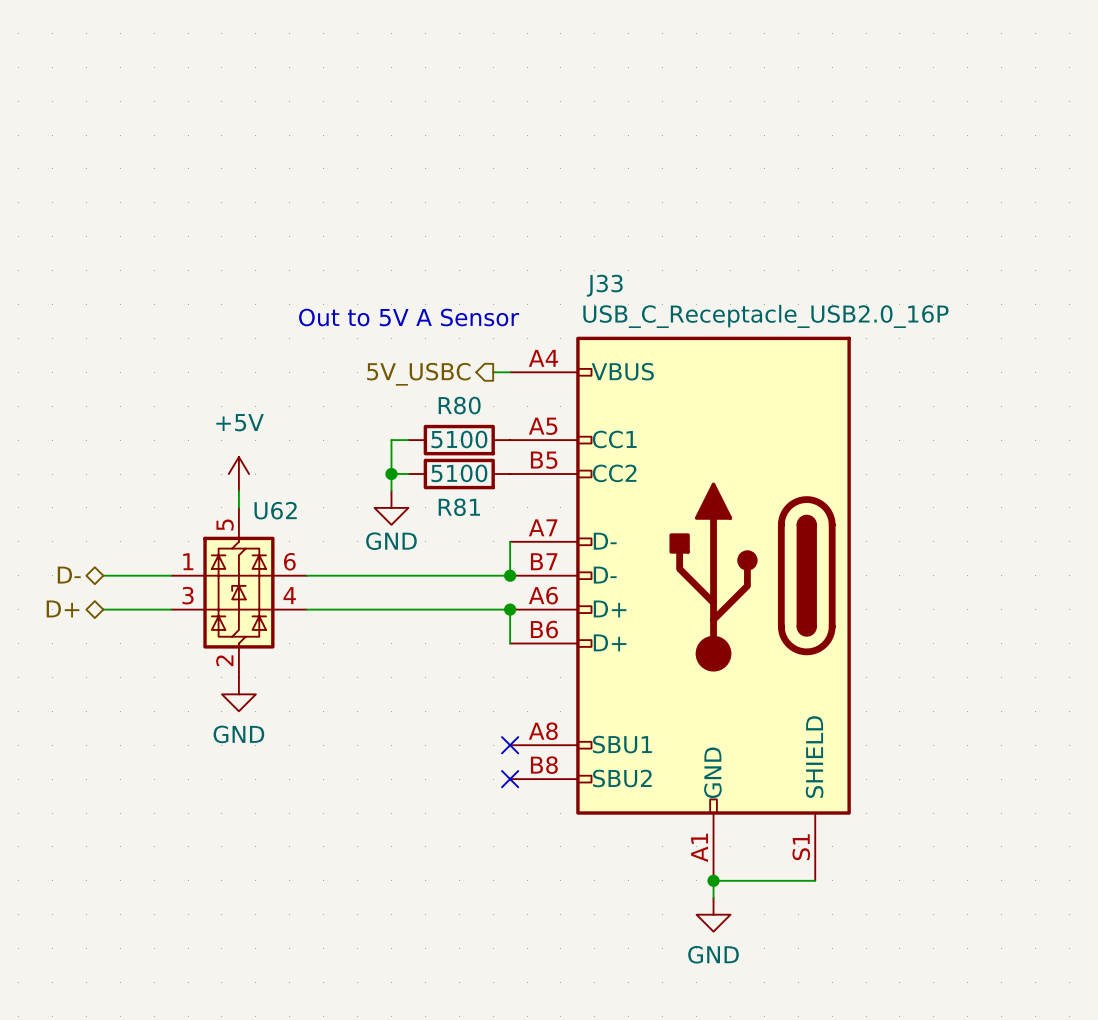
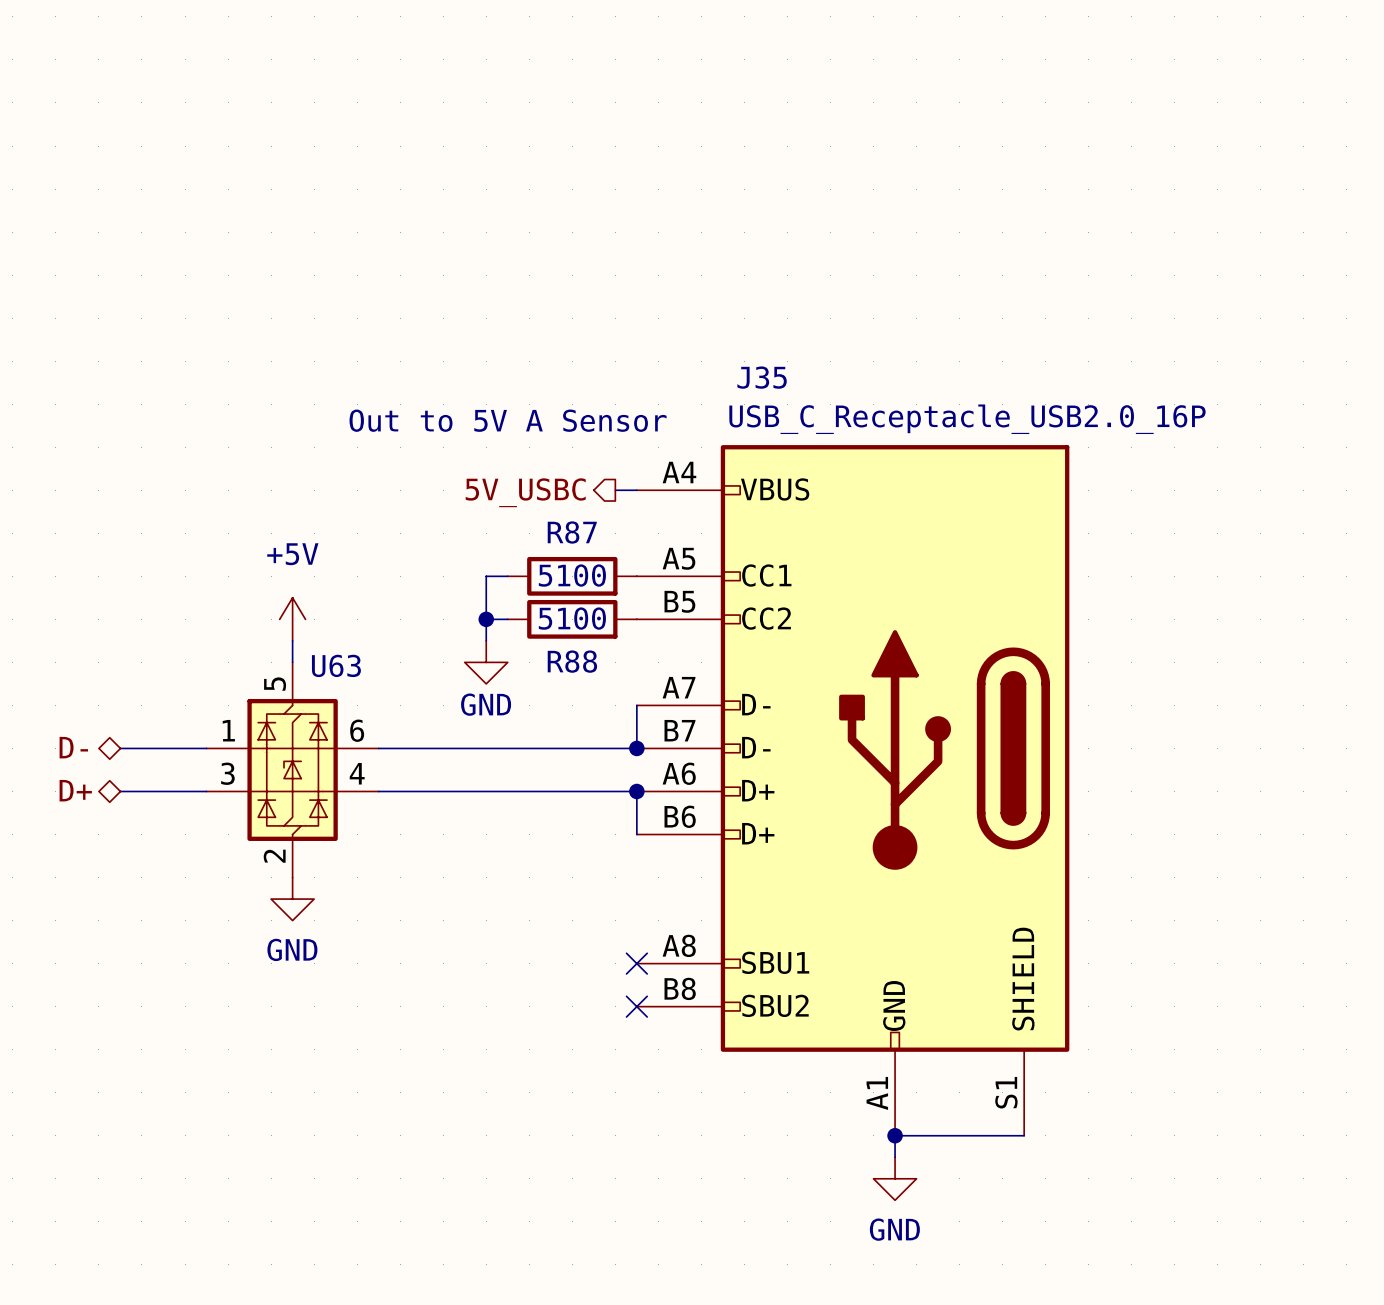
J33 name: J33 (604, 285) -> J35 (762, 377)
R80 name: R80 (459, 405) -> R87 (572, 532)
R81 name: R81 (459, 507) -> R88 (572, 661)
U62 name: U62 (275, 510) -> U63 (336, 665)

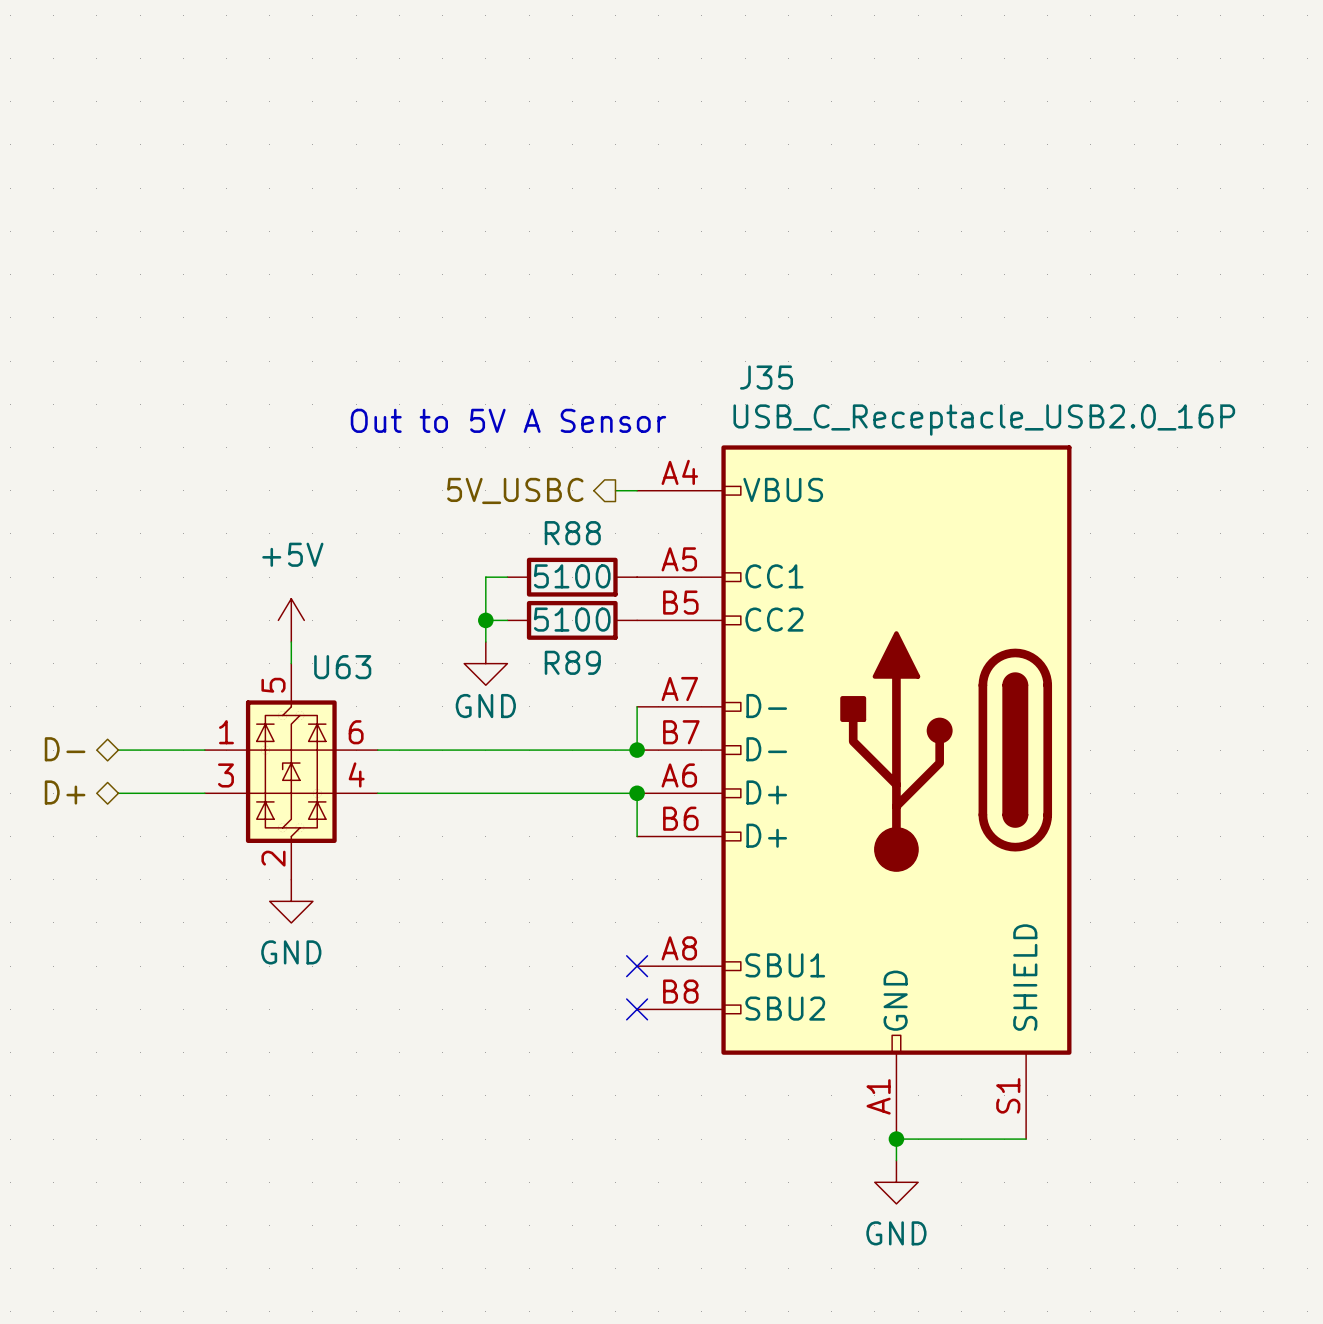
R87 name: R87 (572, 532) -> R88 (572, 533)
R88 name: R88 (572, 661) -> R89 (572, 662)

